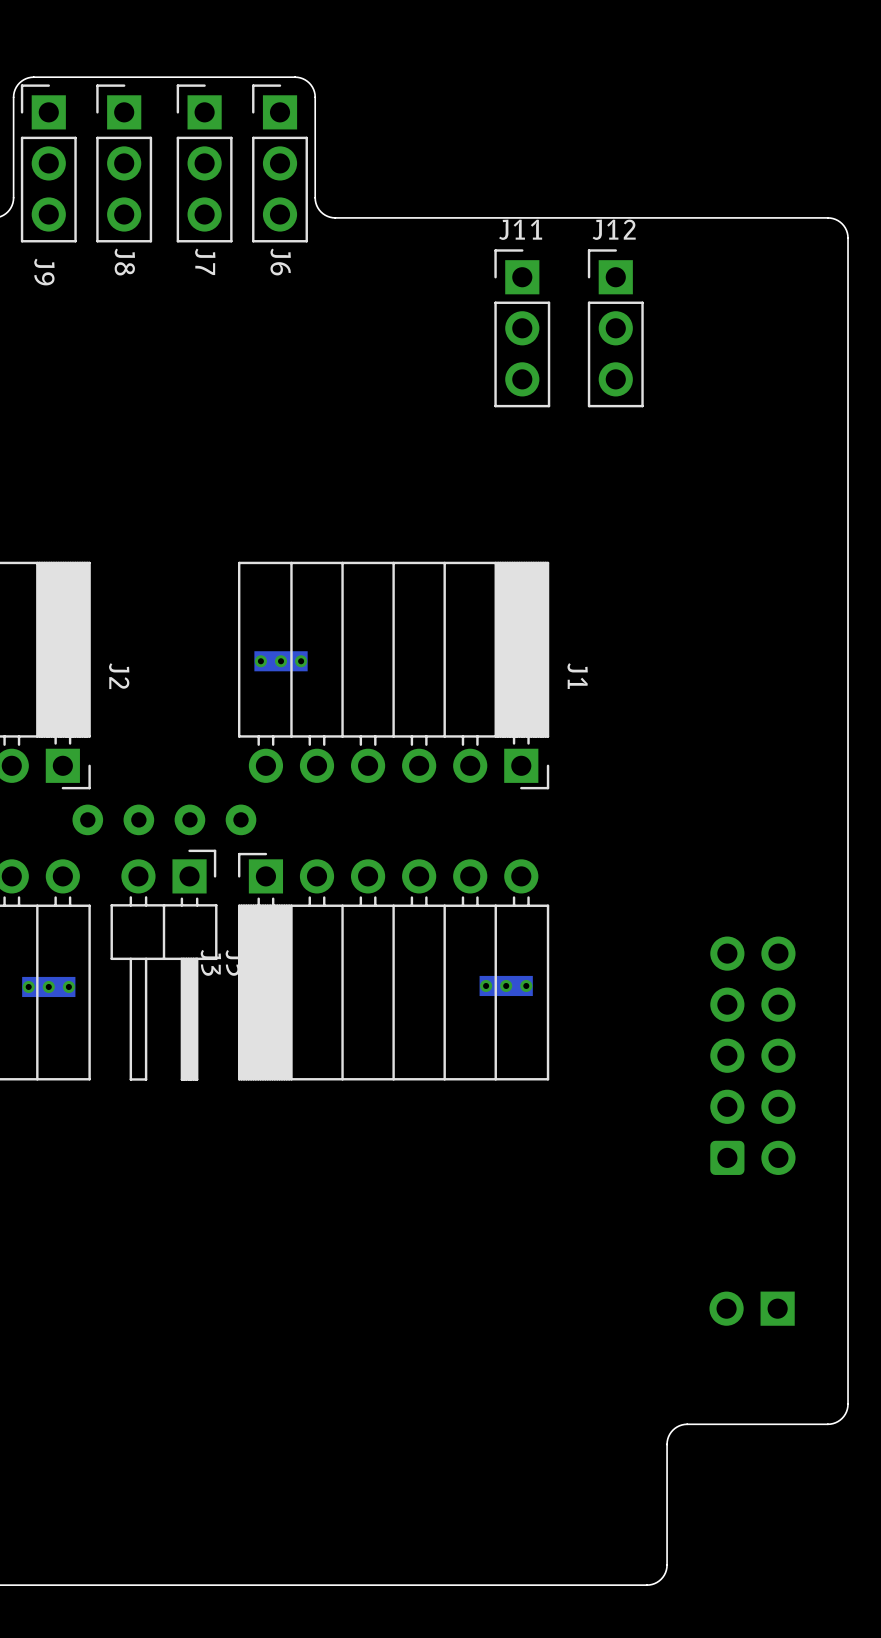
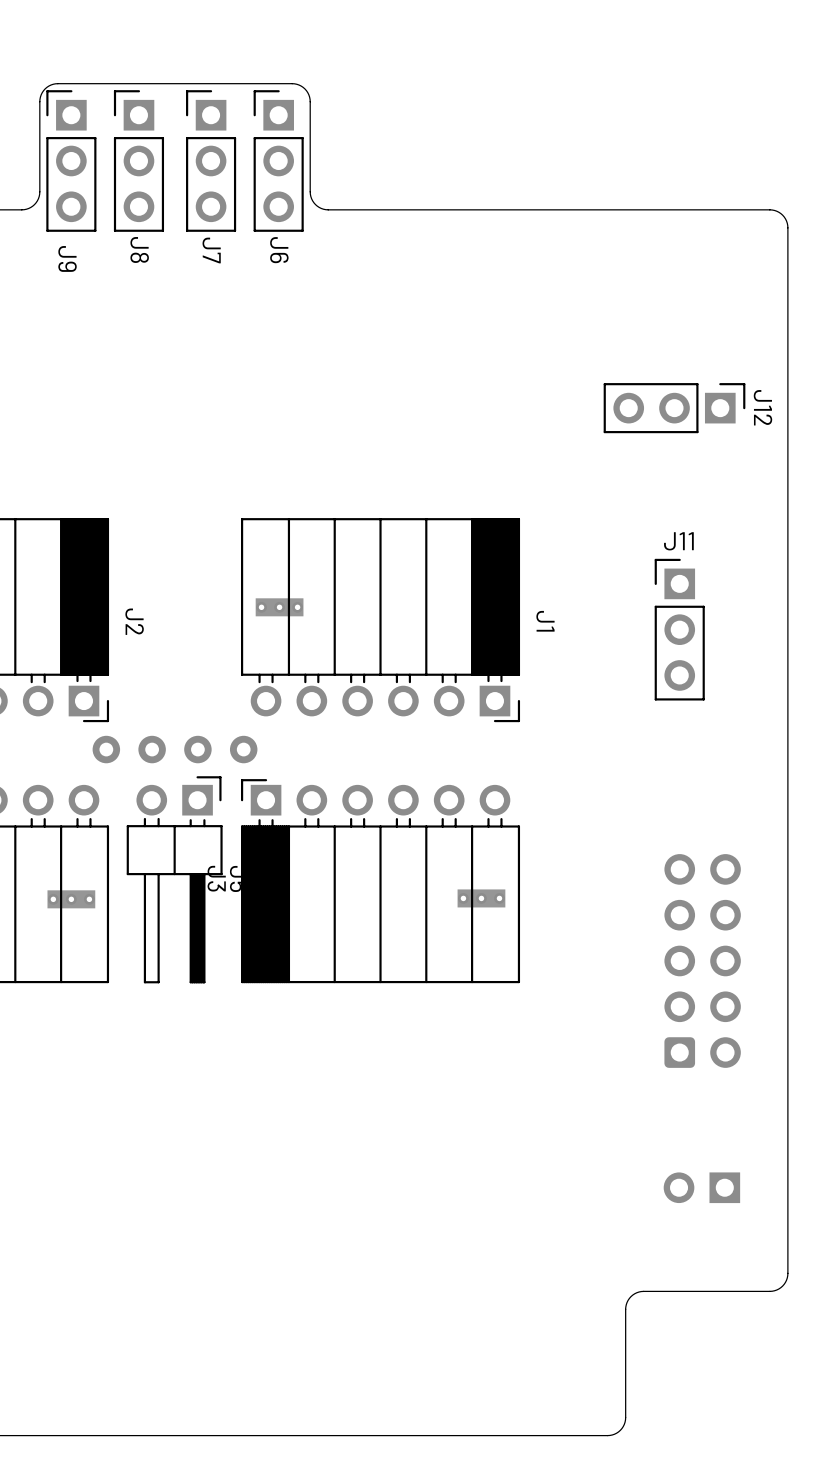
J11 position: (522, 328) -> (679, 629)
J12 rotation: 0° (615, 328) -> 90° clockwise (674, 408)
J12 position: (615, 328) -> (674, 408)

